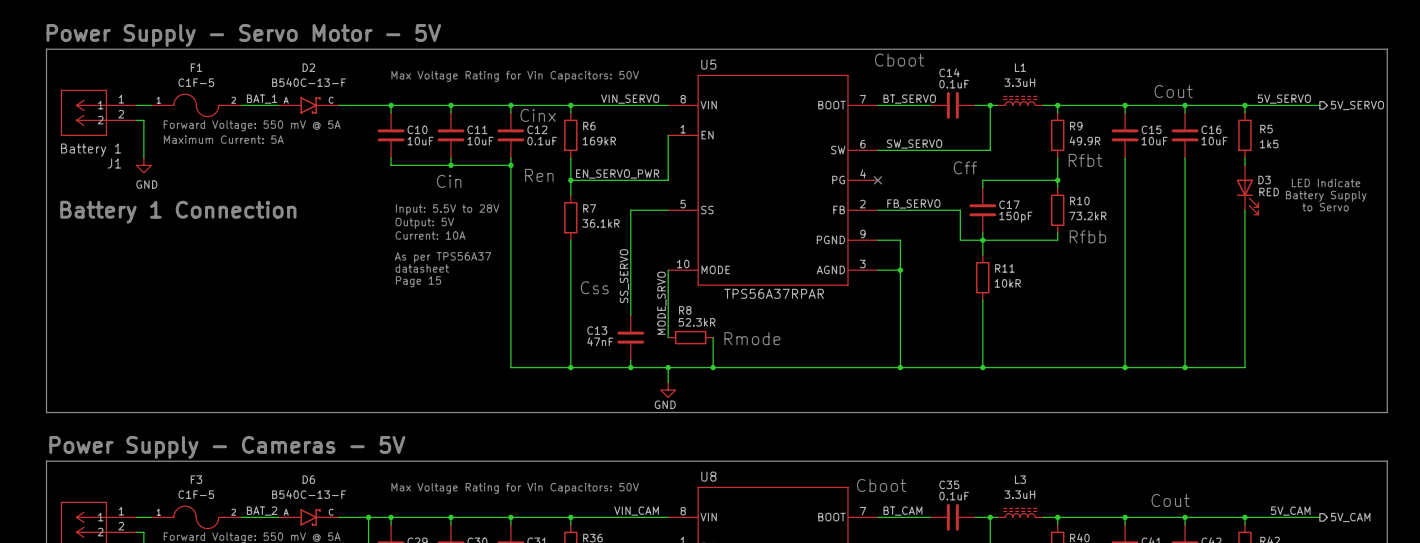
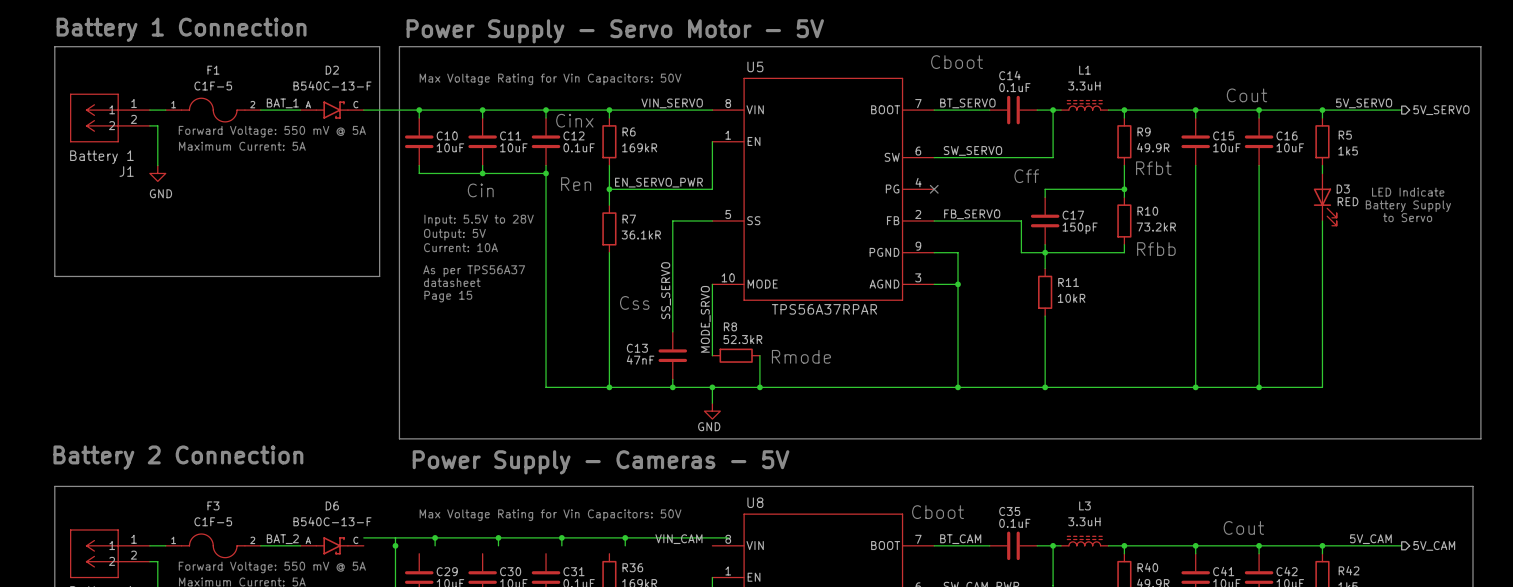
text: none -> Battery 1 Connection (181, 29)
text: none -> Power Supply - Servo Motor - 5V (615, 31)
text: Power Supply - Servo Motor - 5V (243, 35) -> none
line: none -> (399, 46) (1480, 46) (1480, 438) (399, 438) (399, 46)
line: (46, 49) (1387, 49) (1387, 412) (46, 412) (46, 262) -> (54, 50) (54, 46) (379, 46) (379, 276) (54, 276)
text: Battery 1 Connection (178, 212) -> none
text: none -> Battery 2 Connection (178, 457)
text: none -> Power Supply - Cameras - 5V (601, 462)
text: Power Supply - Cameras - 5V (227, 447) -> none
wire: none -> (363, 537) (728, 537)
wire: none -> (395, 537) (395, 545)
wire: (338, 517) (668, 517) -> none
wire: (391, 517) (391, 524) -> (435, 537) (435, 545)
junction position: (391, 517) -> (435, 537)
wire: (450, 517) (450, 524) -> (498, 537) (498, 545)
junction position: (450, 517) -> (498, 537)
wire: (510, 517) (510, 524) -> (561, 537) (561, 545)
junction position: (510, 517) -> (561, 537)
wire: (570, 517) (570, 524) -> (625, 537) (625, 545)
junction position: (570, 517) -> (625, 537)

